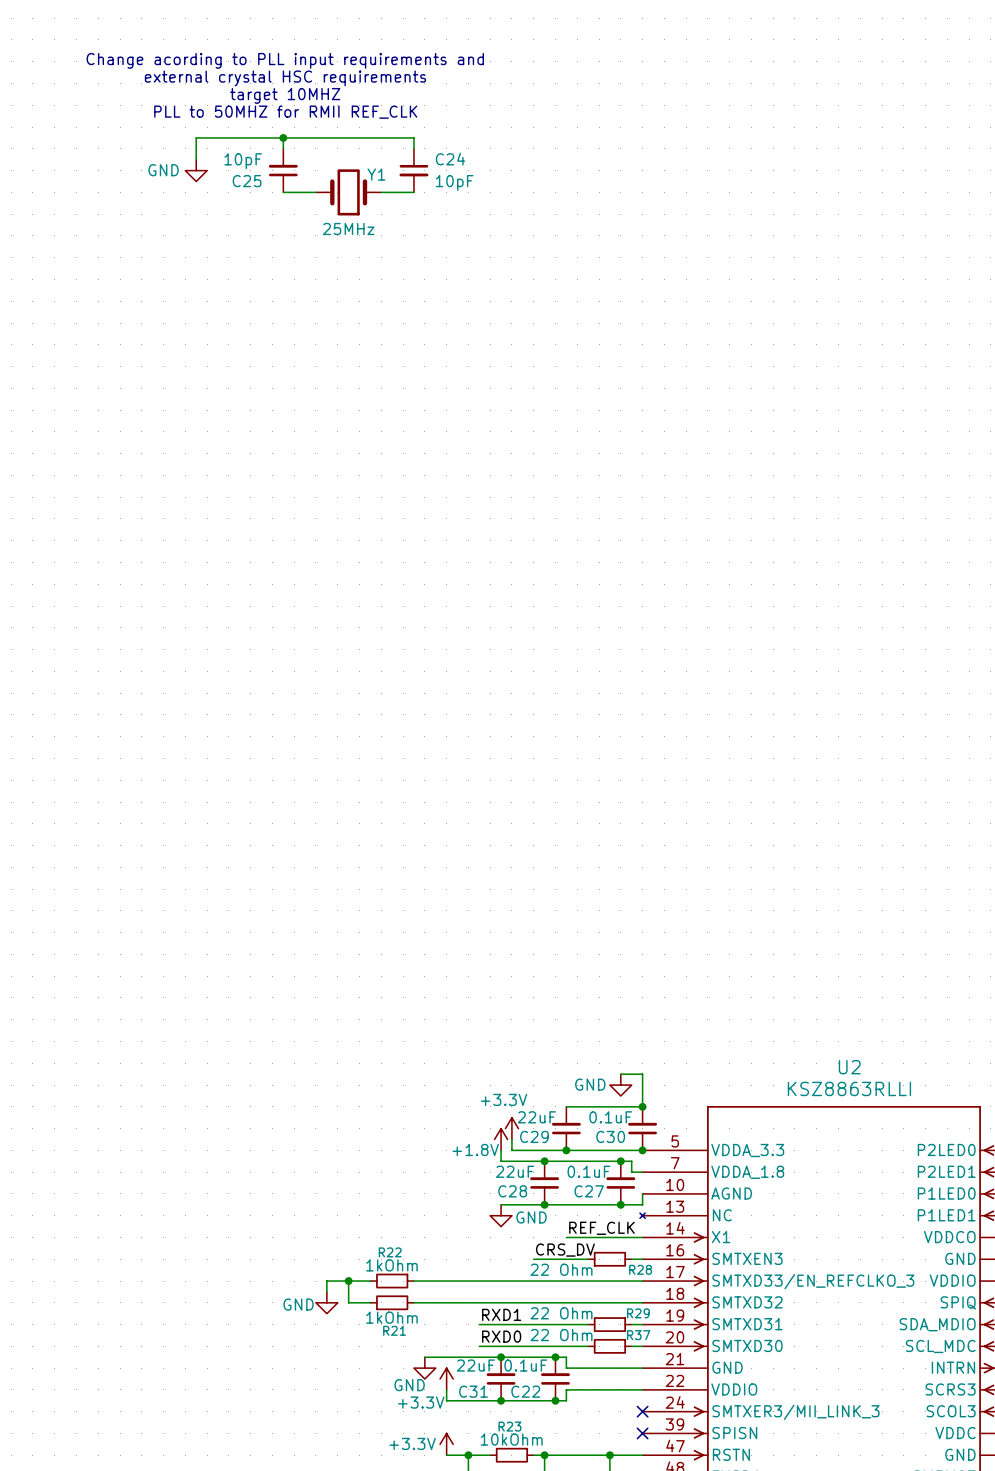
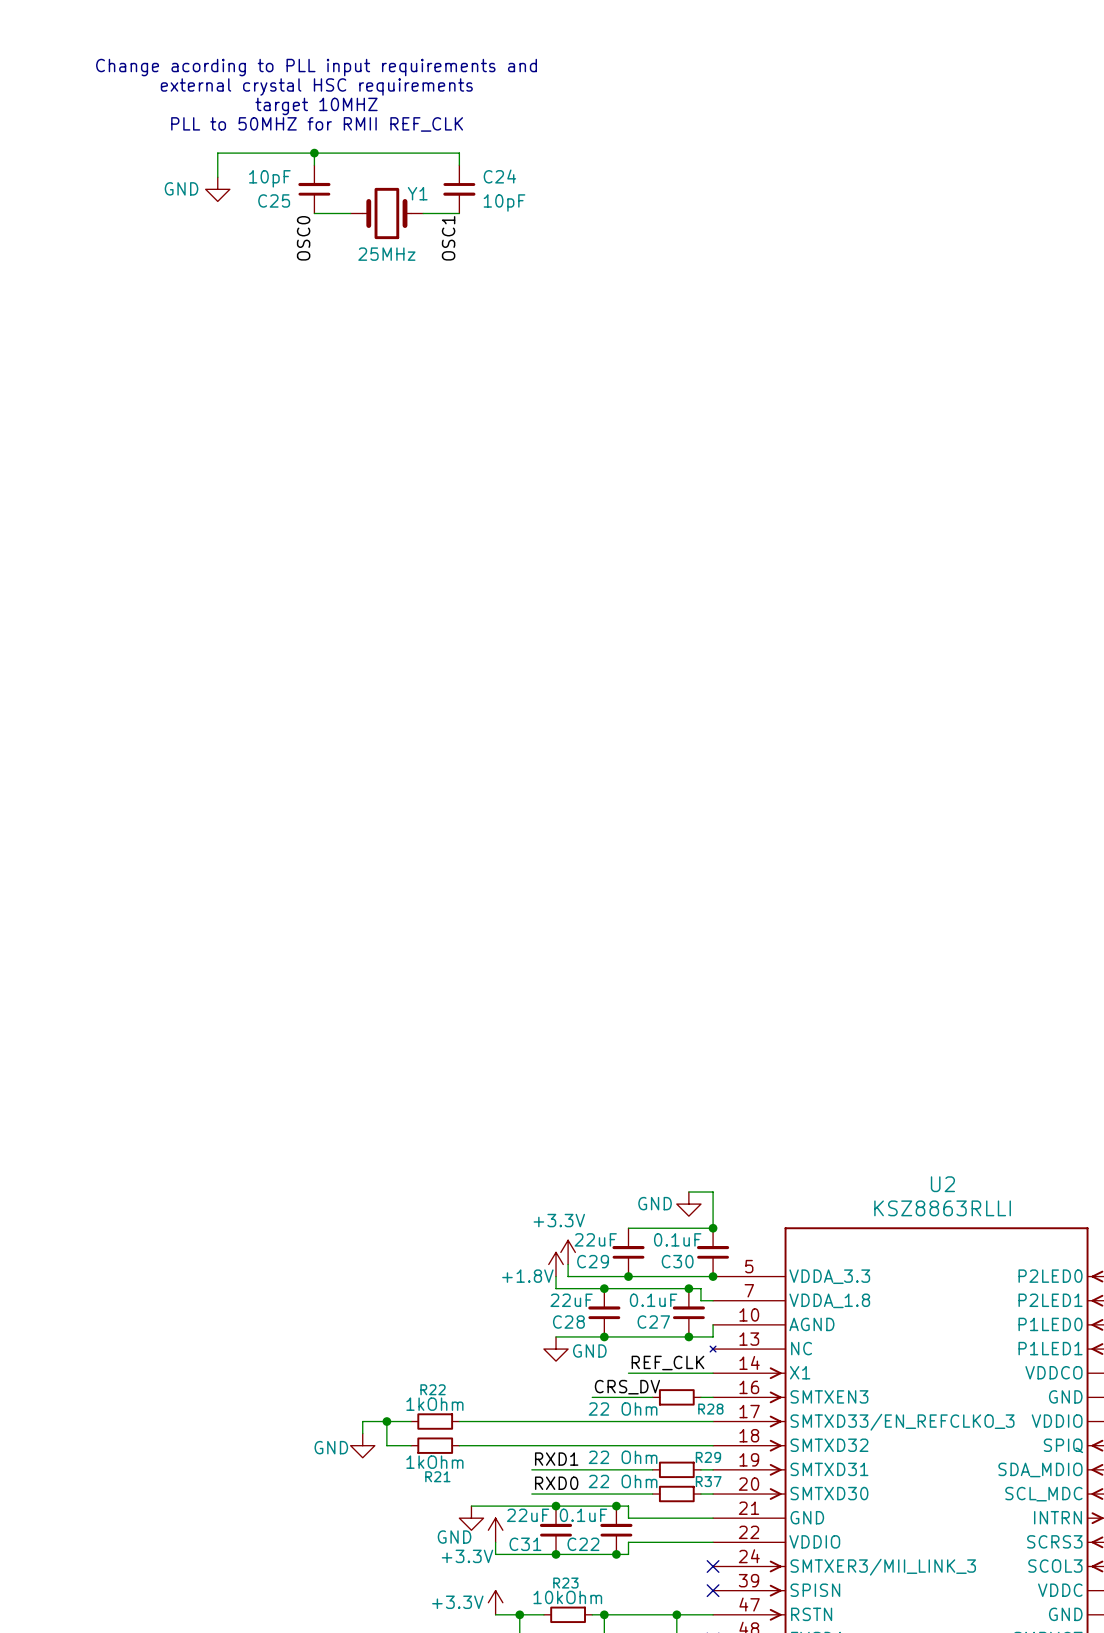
label: none -> OSC0 (303, 238)
label: none -> OSC1 (448, 238)

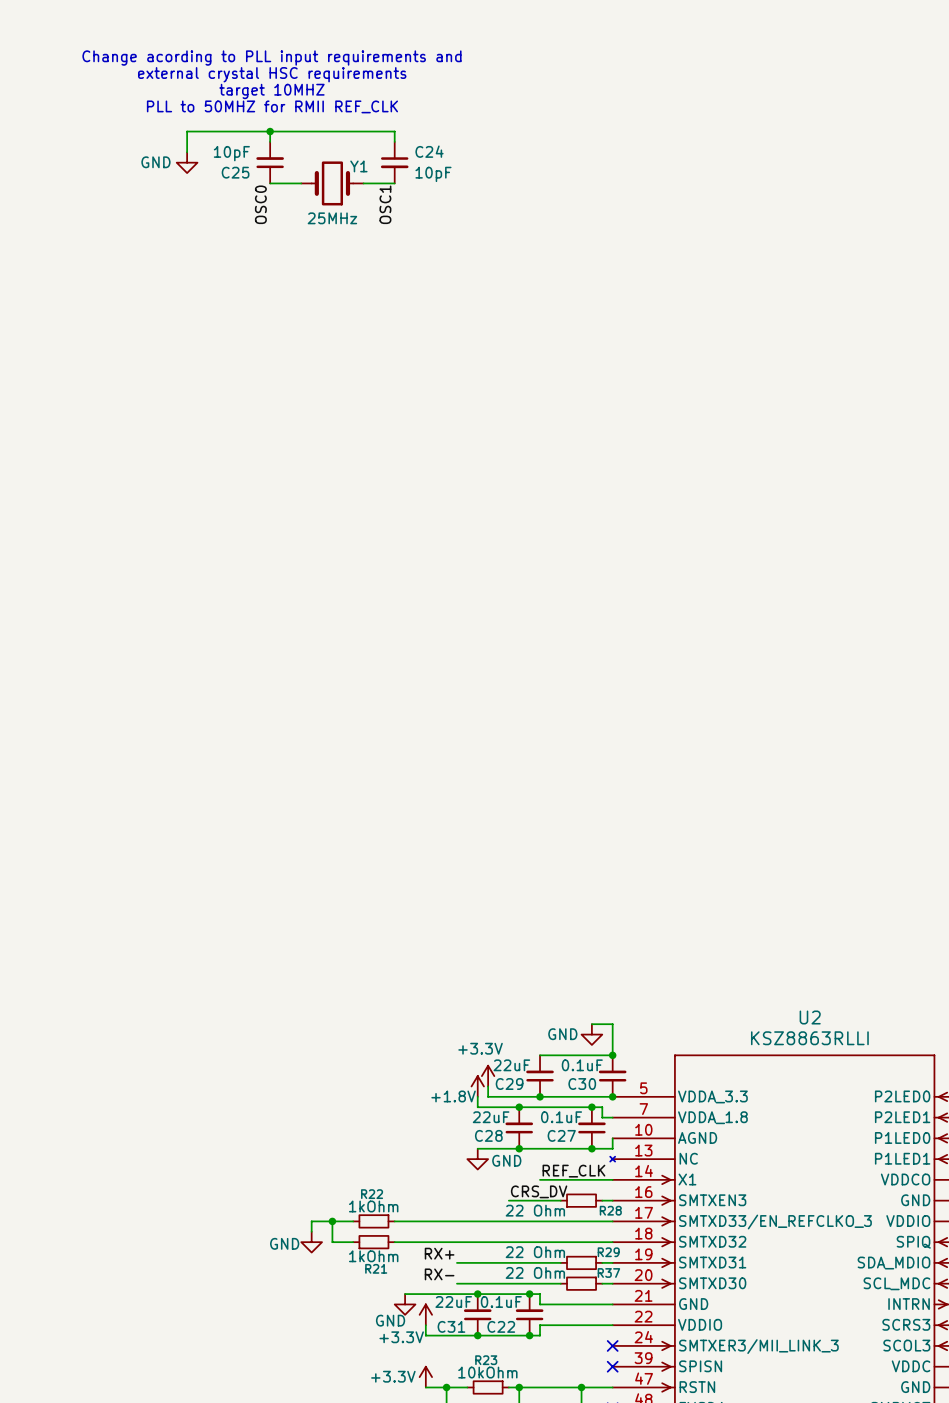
label: RXD1 (556, 1459) -> RX+ (439, 1253)
label: RXD0 (556, 1483) -> RX- (439, 1274)

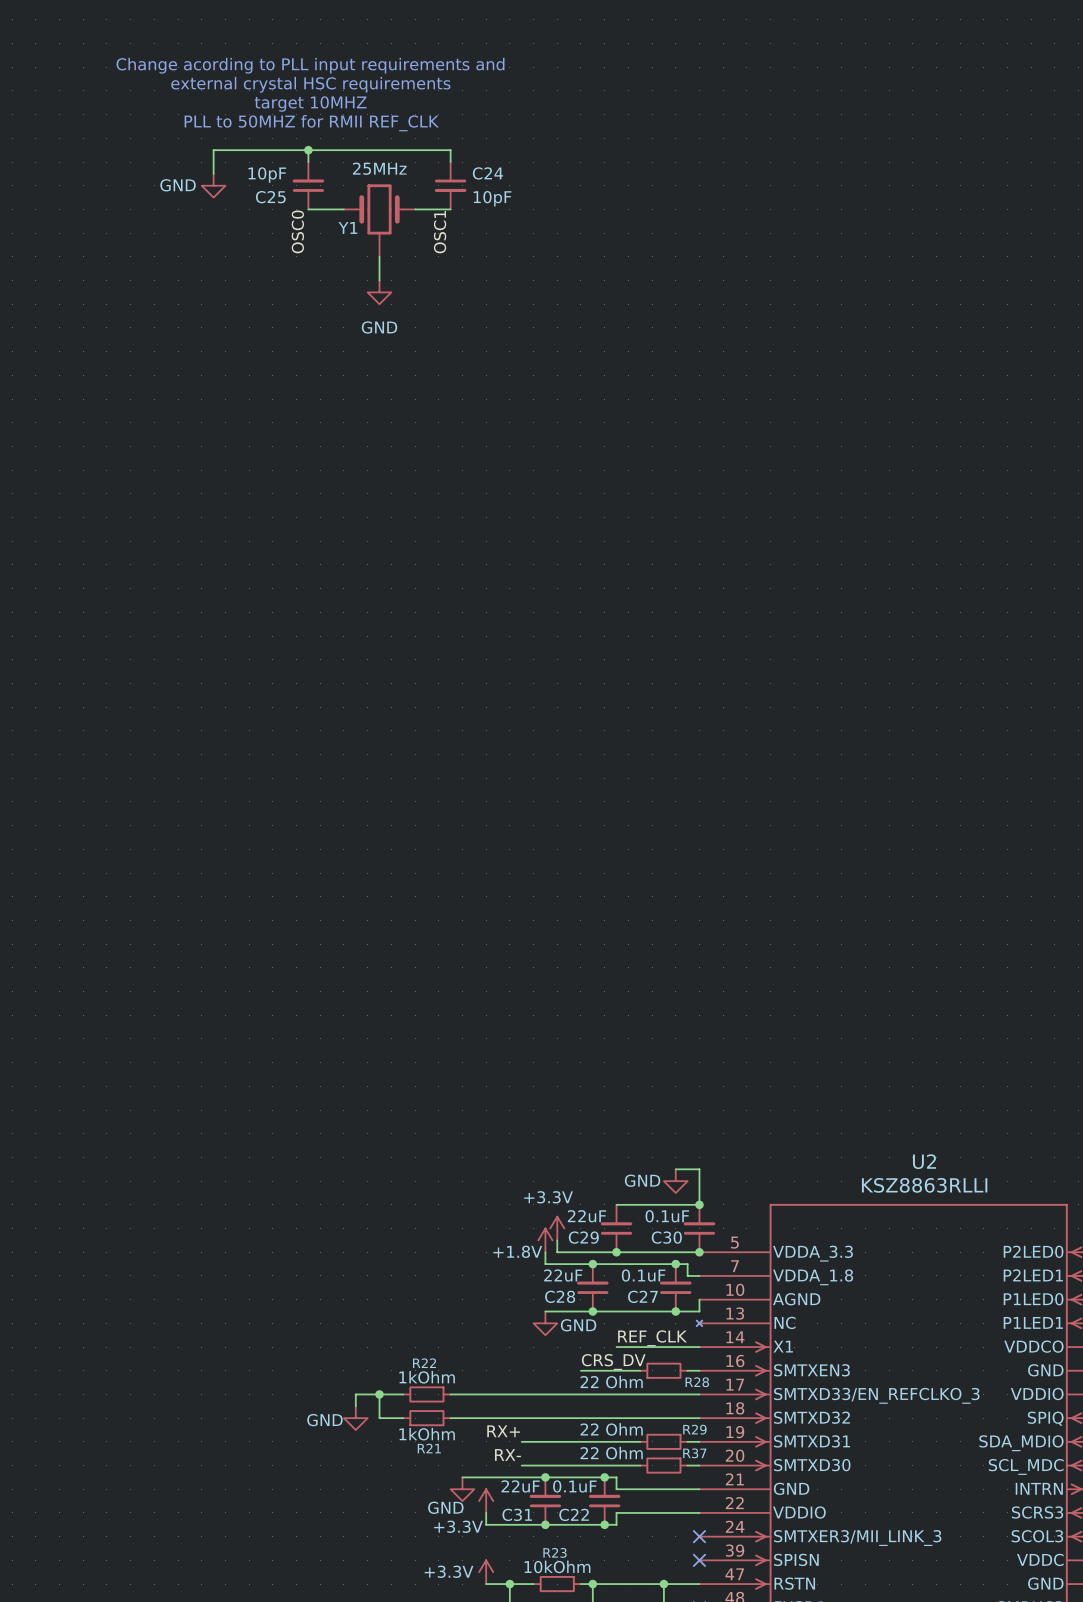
Y1 symbol: [301, 161, 364, 206] -> [343, 184, 416, 257]
Y1 name position: Y1 (358, 166) -> Y1 (347, 227)
Y1 value position: 25MHz (332, 218) -> 25MHz (379, 168)
wire: none -> (379, 256) (379, 280)
power symbol: none -> GND (379, 292)

